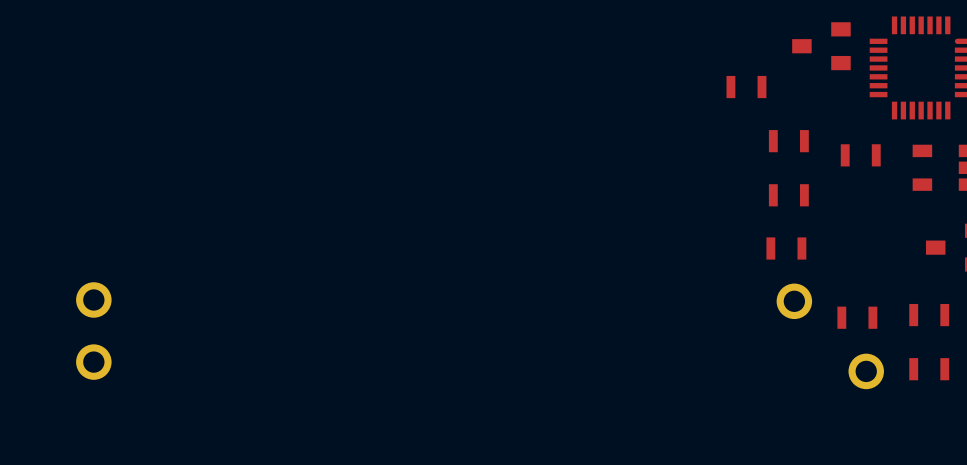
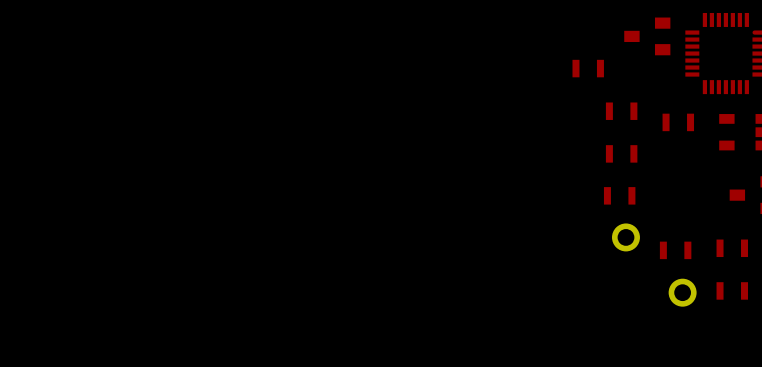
part: (93, 299) -> none
part: (93, 362) -> none

